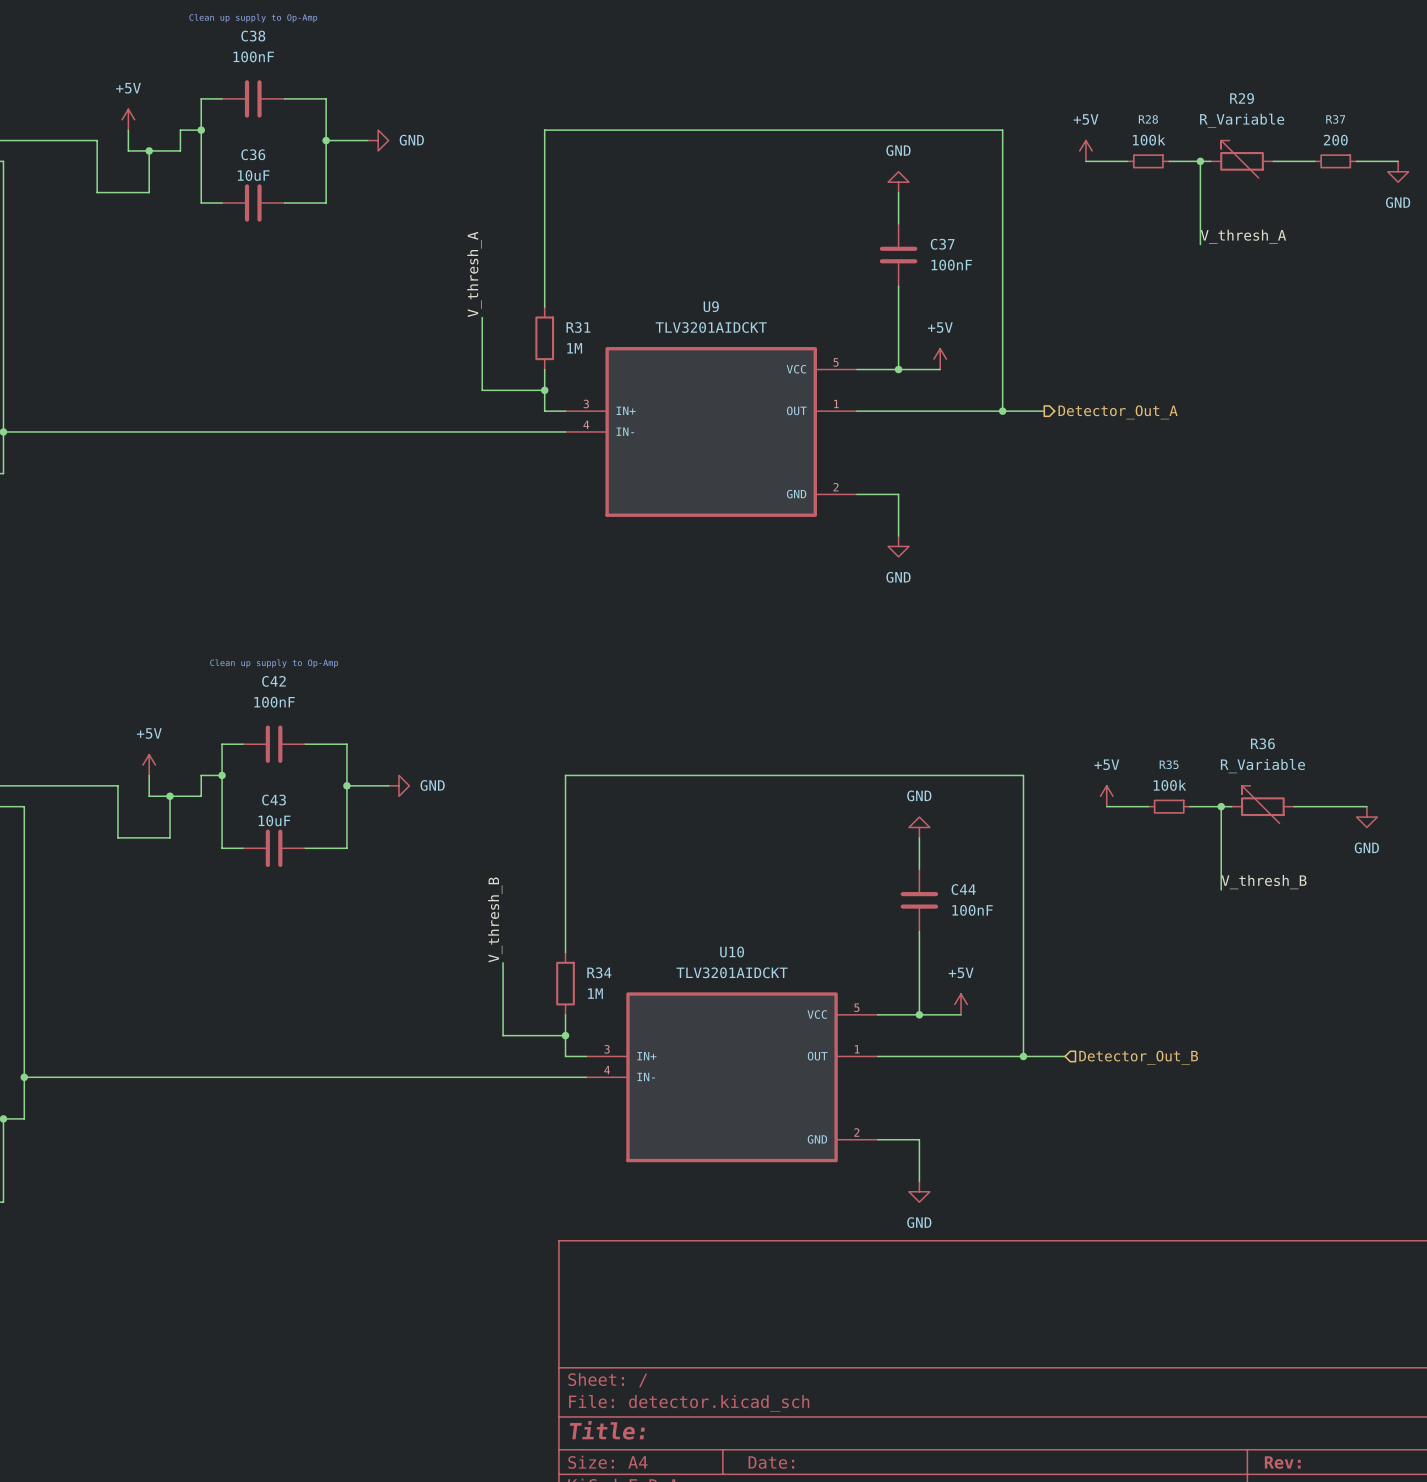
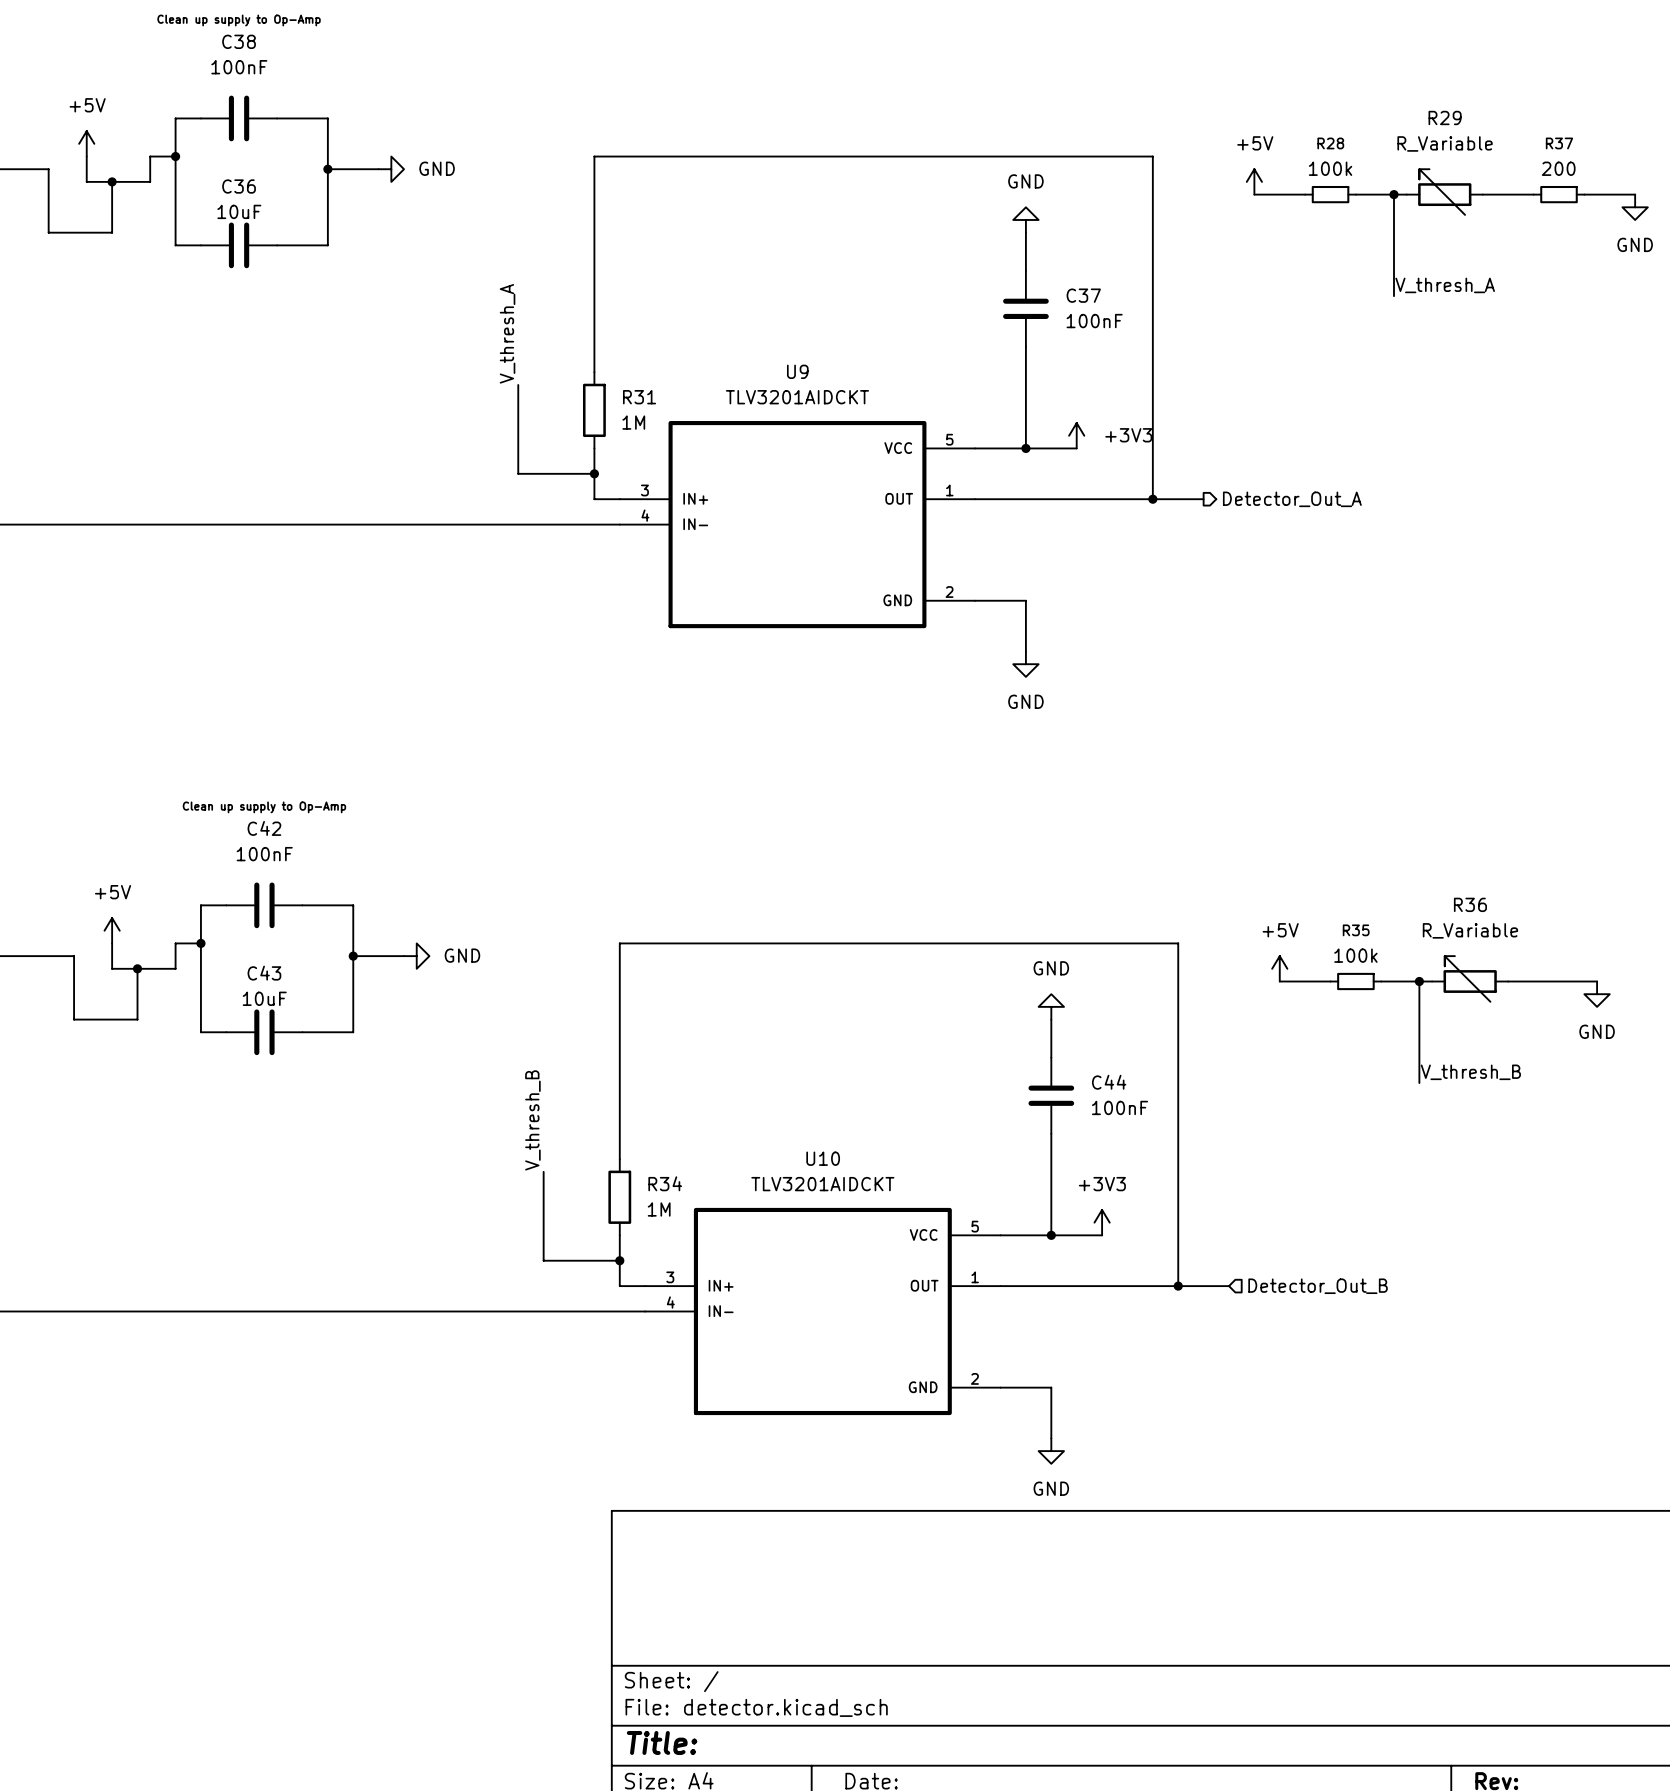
power symbol: +5V (940, 359) -> +3V3 (1076, 435)
power symbol: +5V (961, 1004) -> +3V3 (1102, 1222)

